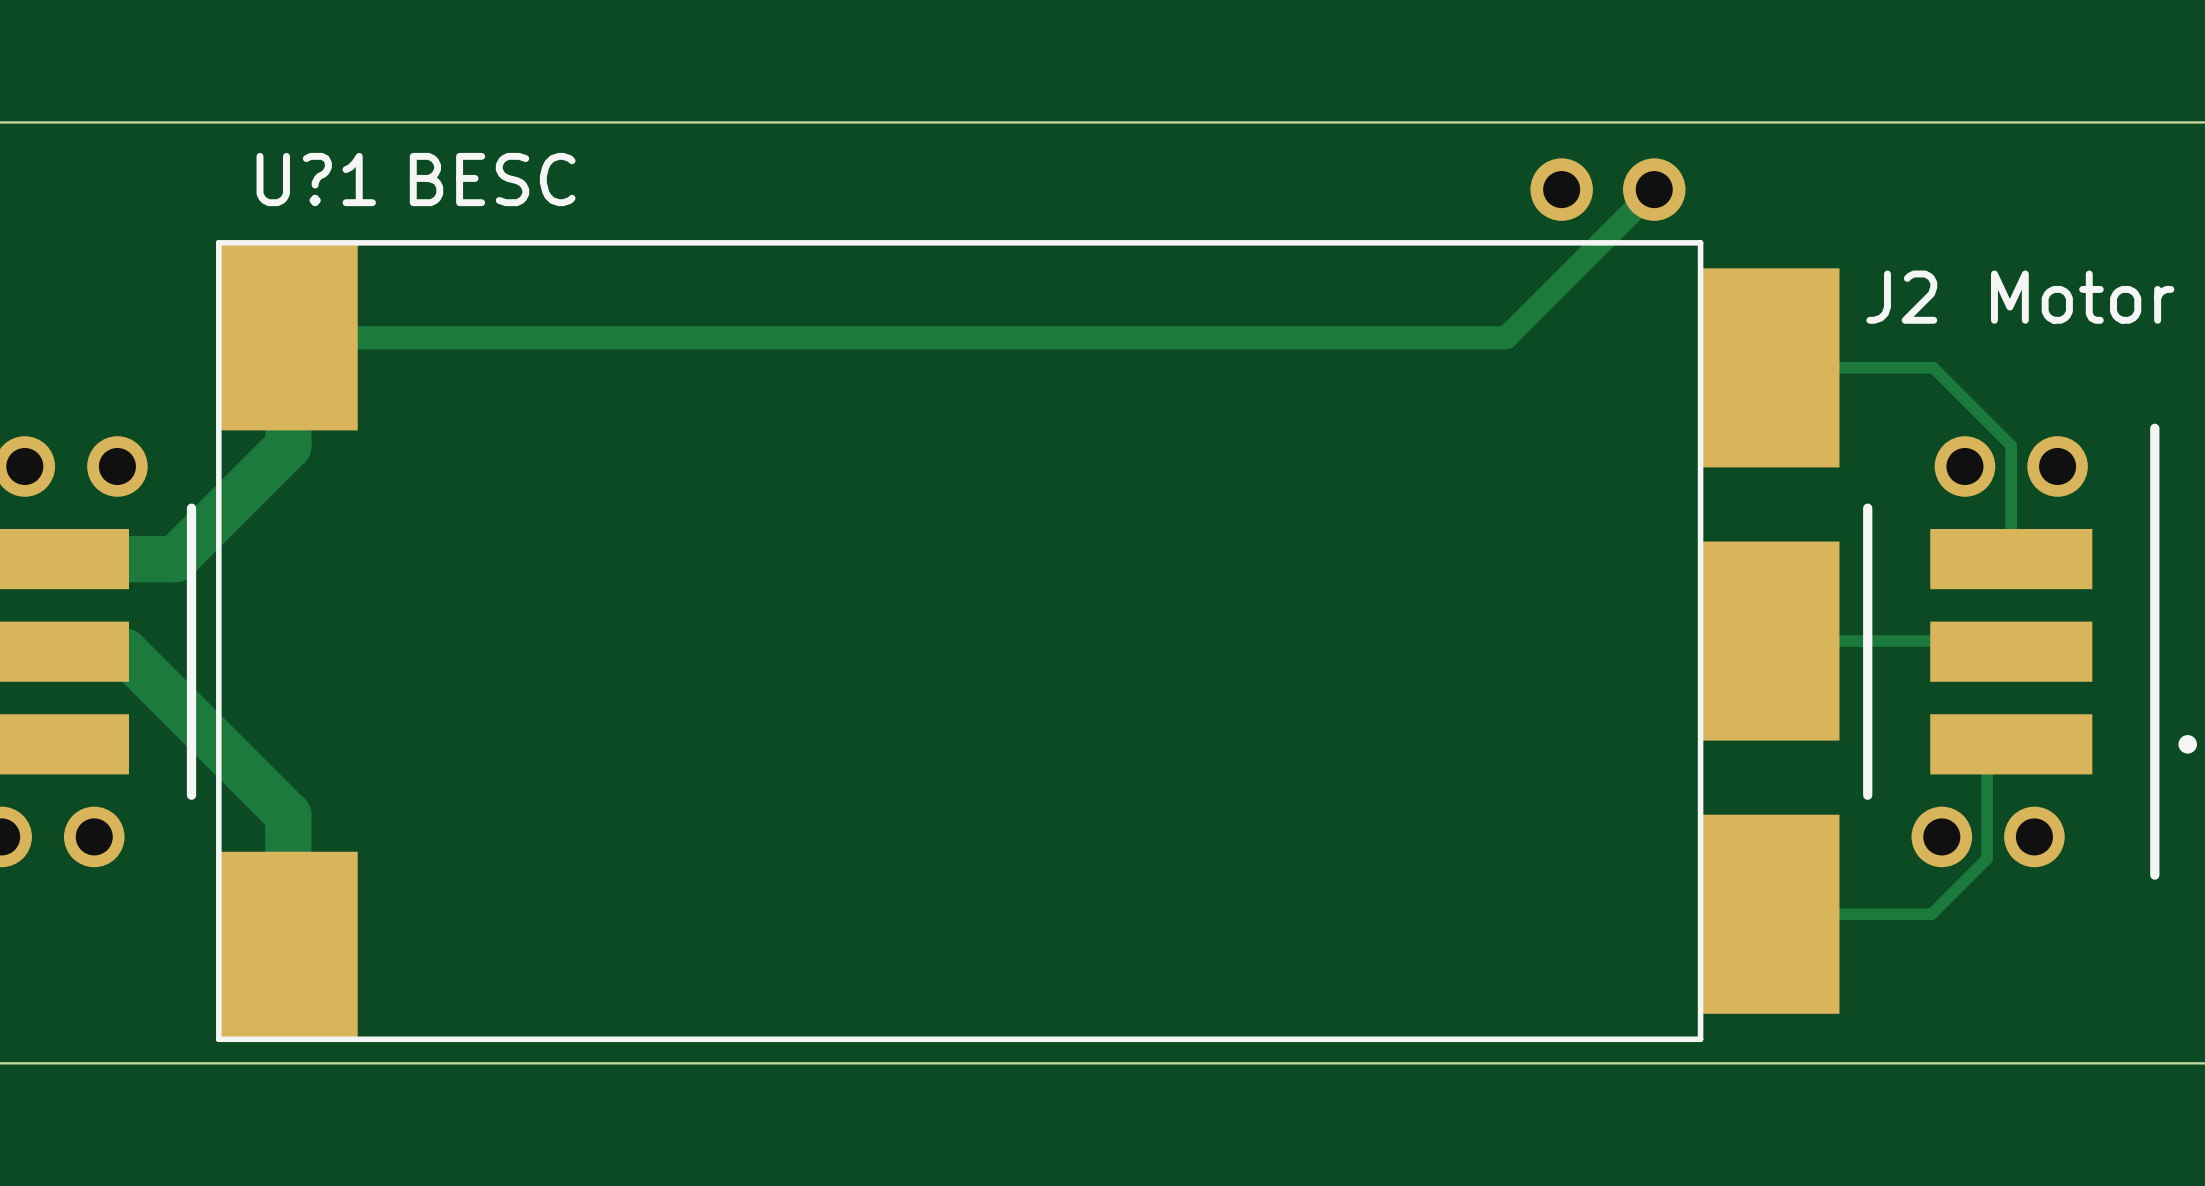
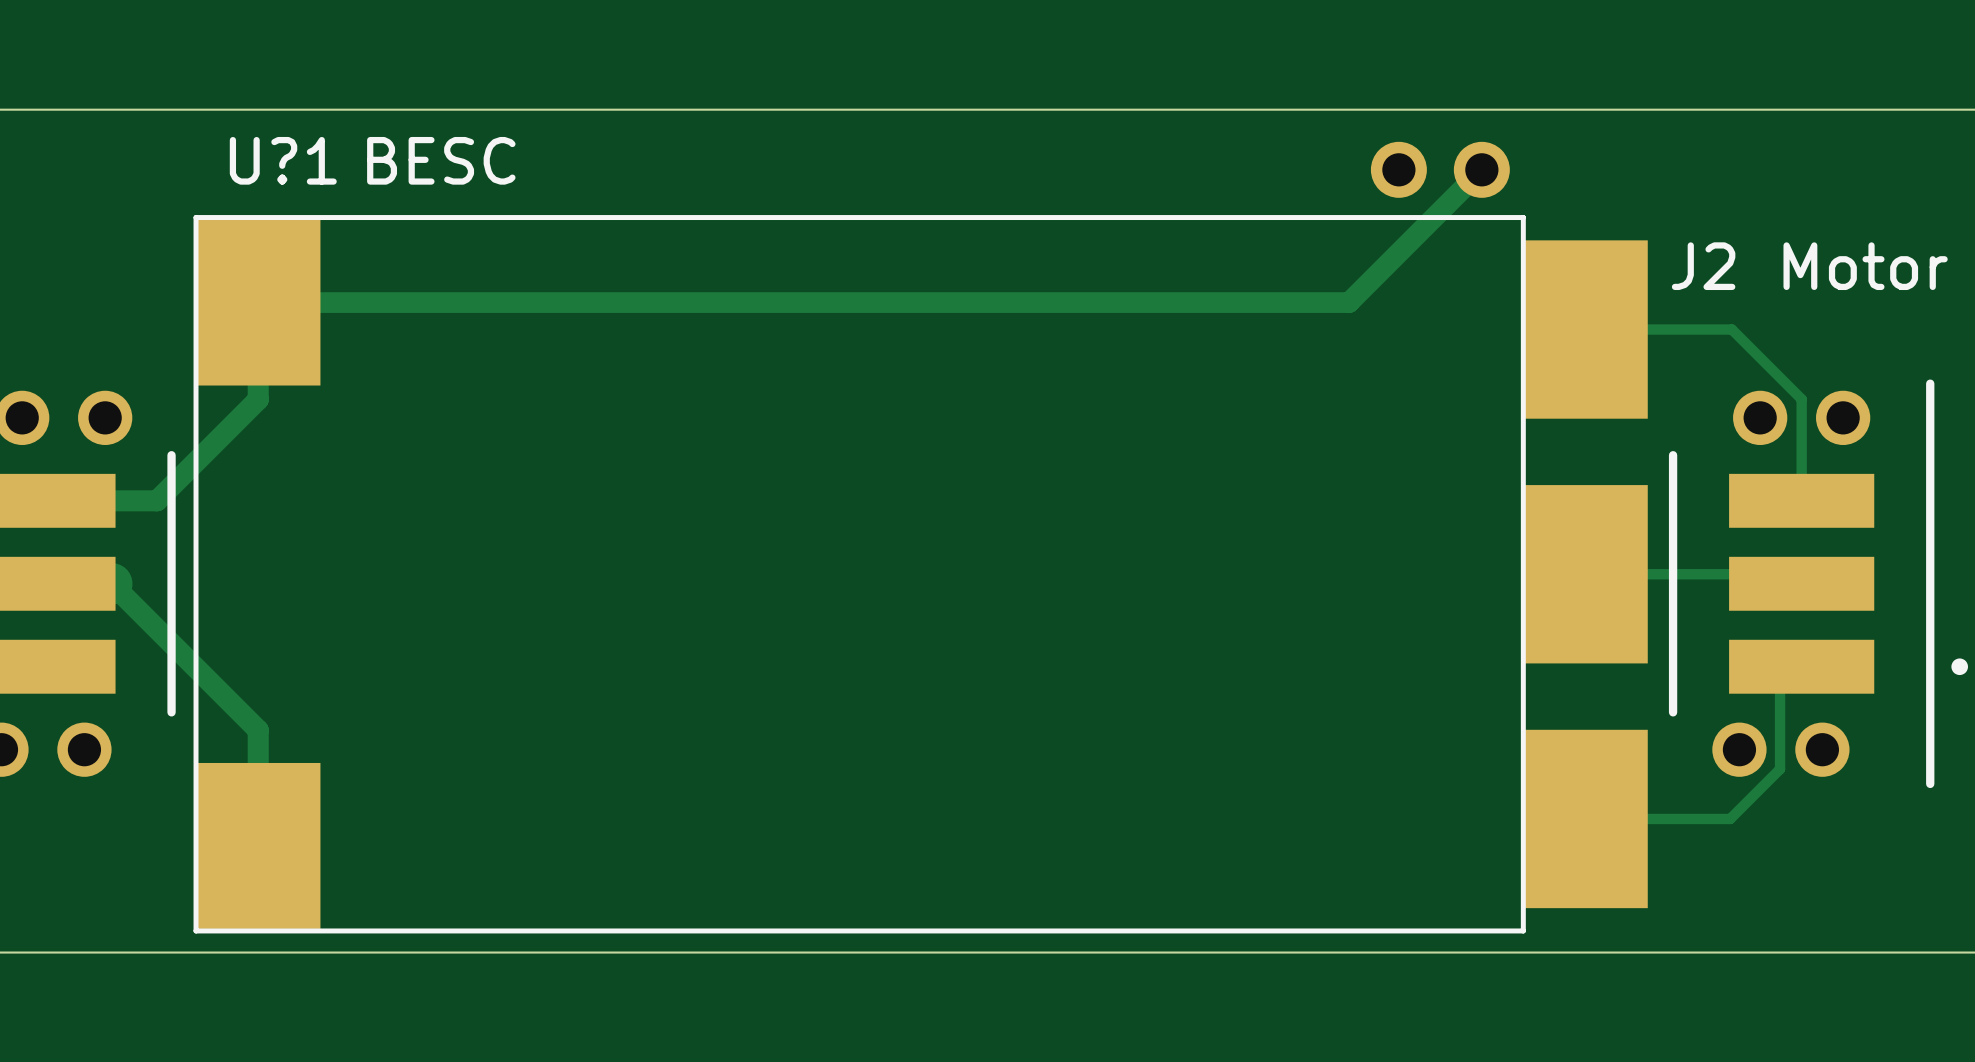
track width: thick (288, 337) (288, 446) (175, 559) (47, 559) -> thin (258, 302) (258, 399) (157, 500) (42, 500)
track width: thick (124, 651) (288, 815) (288, 944) -> thin (111, 583) (258, 730) (258, 845)

